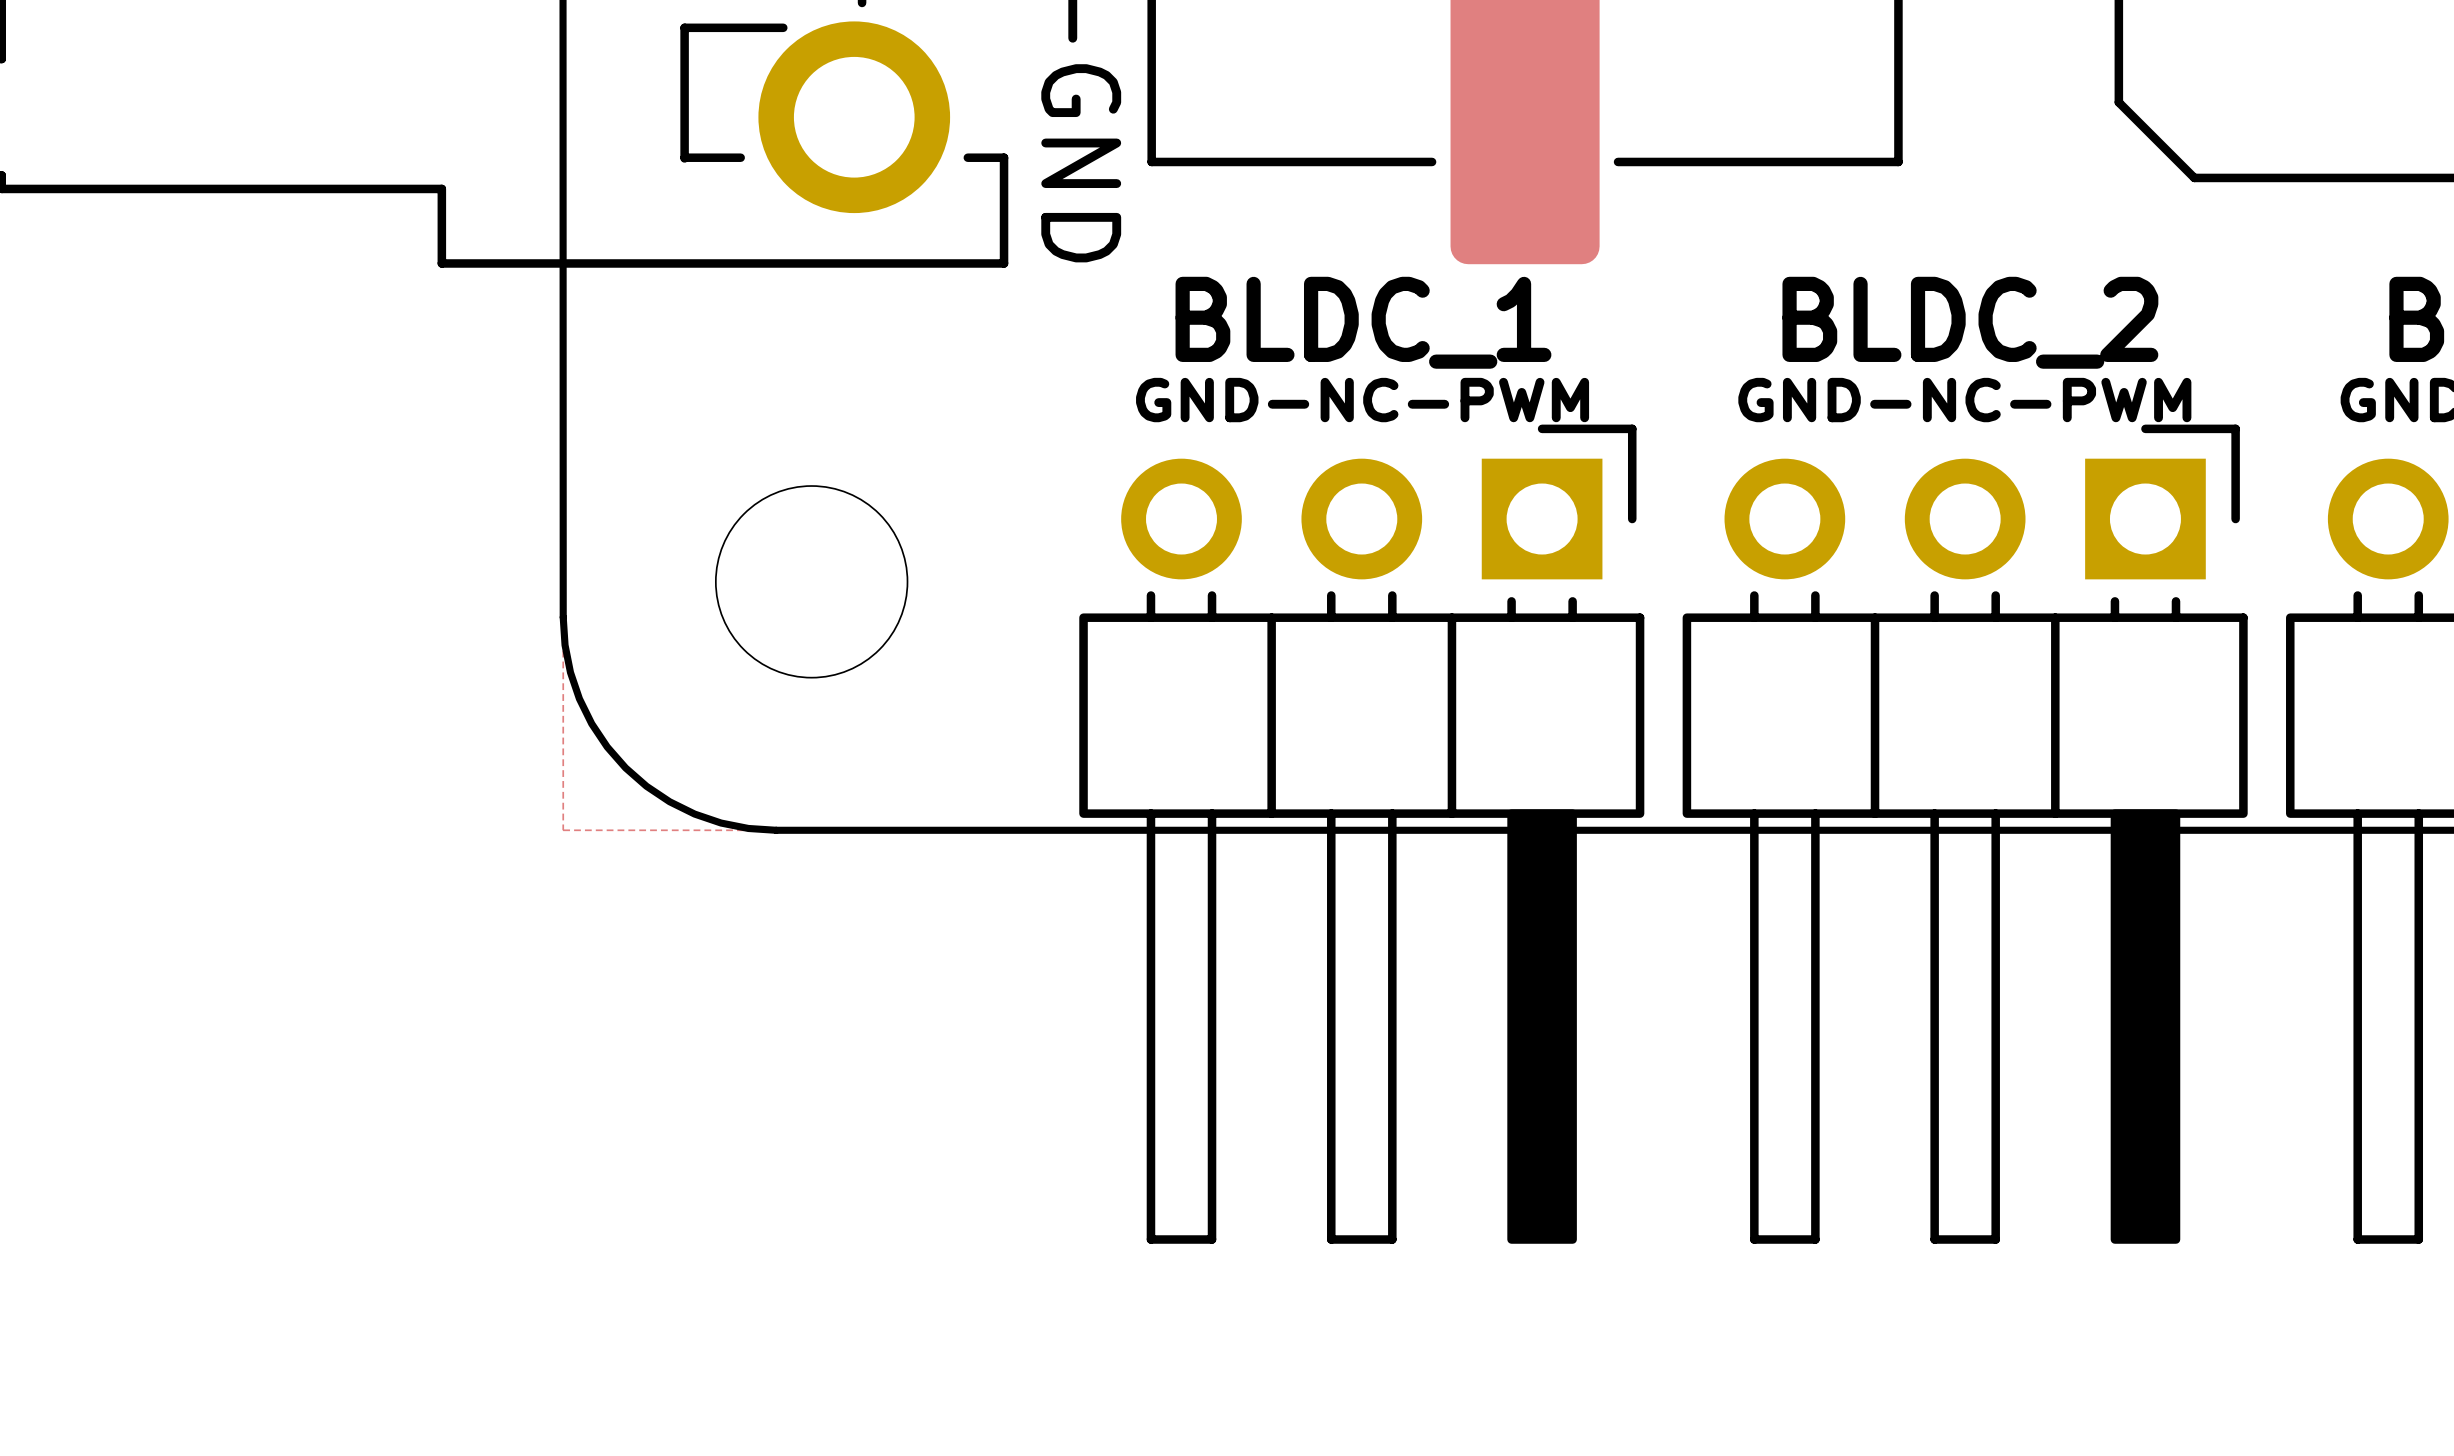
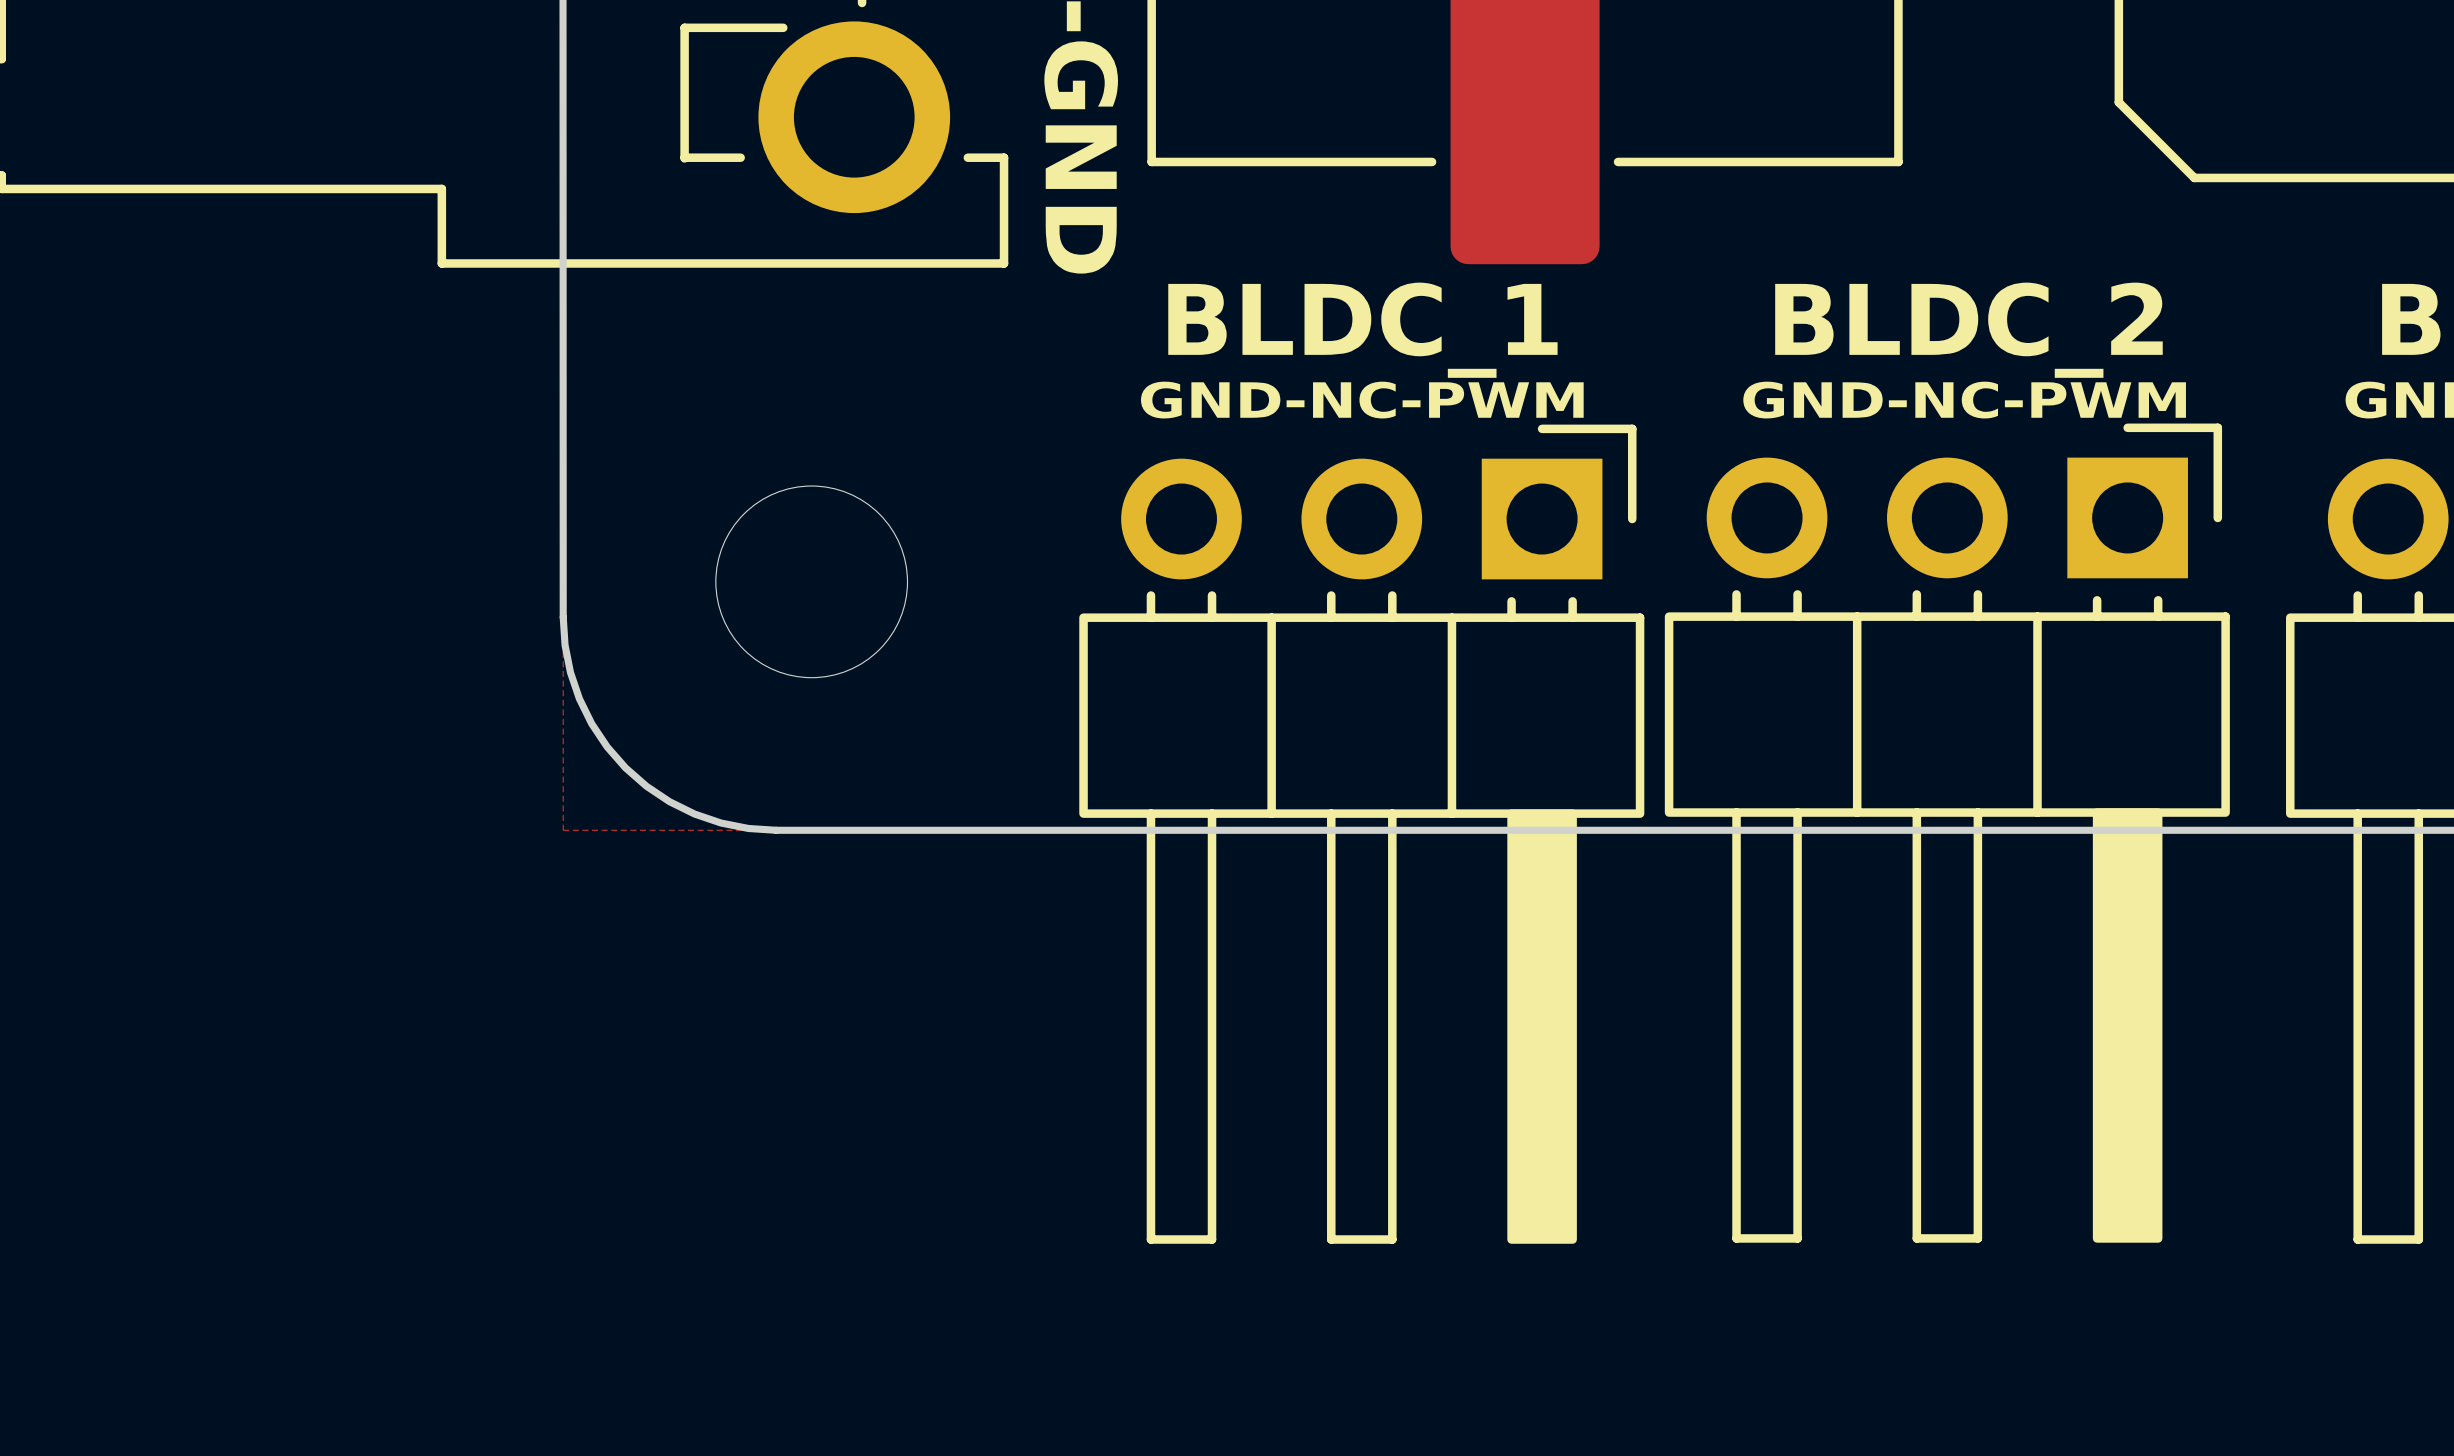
part position: (1965, 834) -> (1947, 833)

